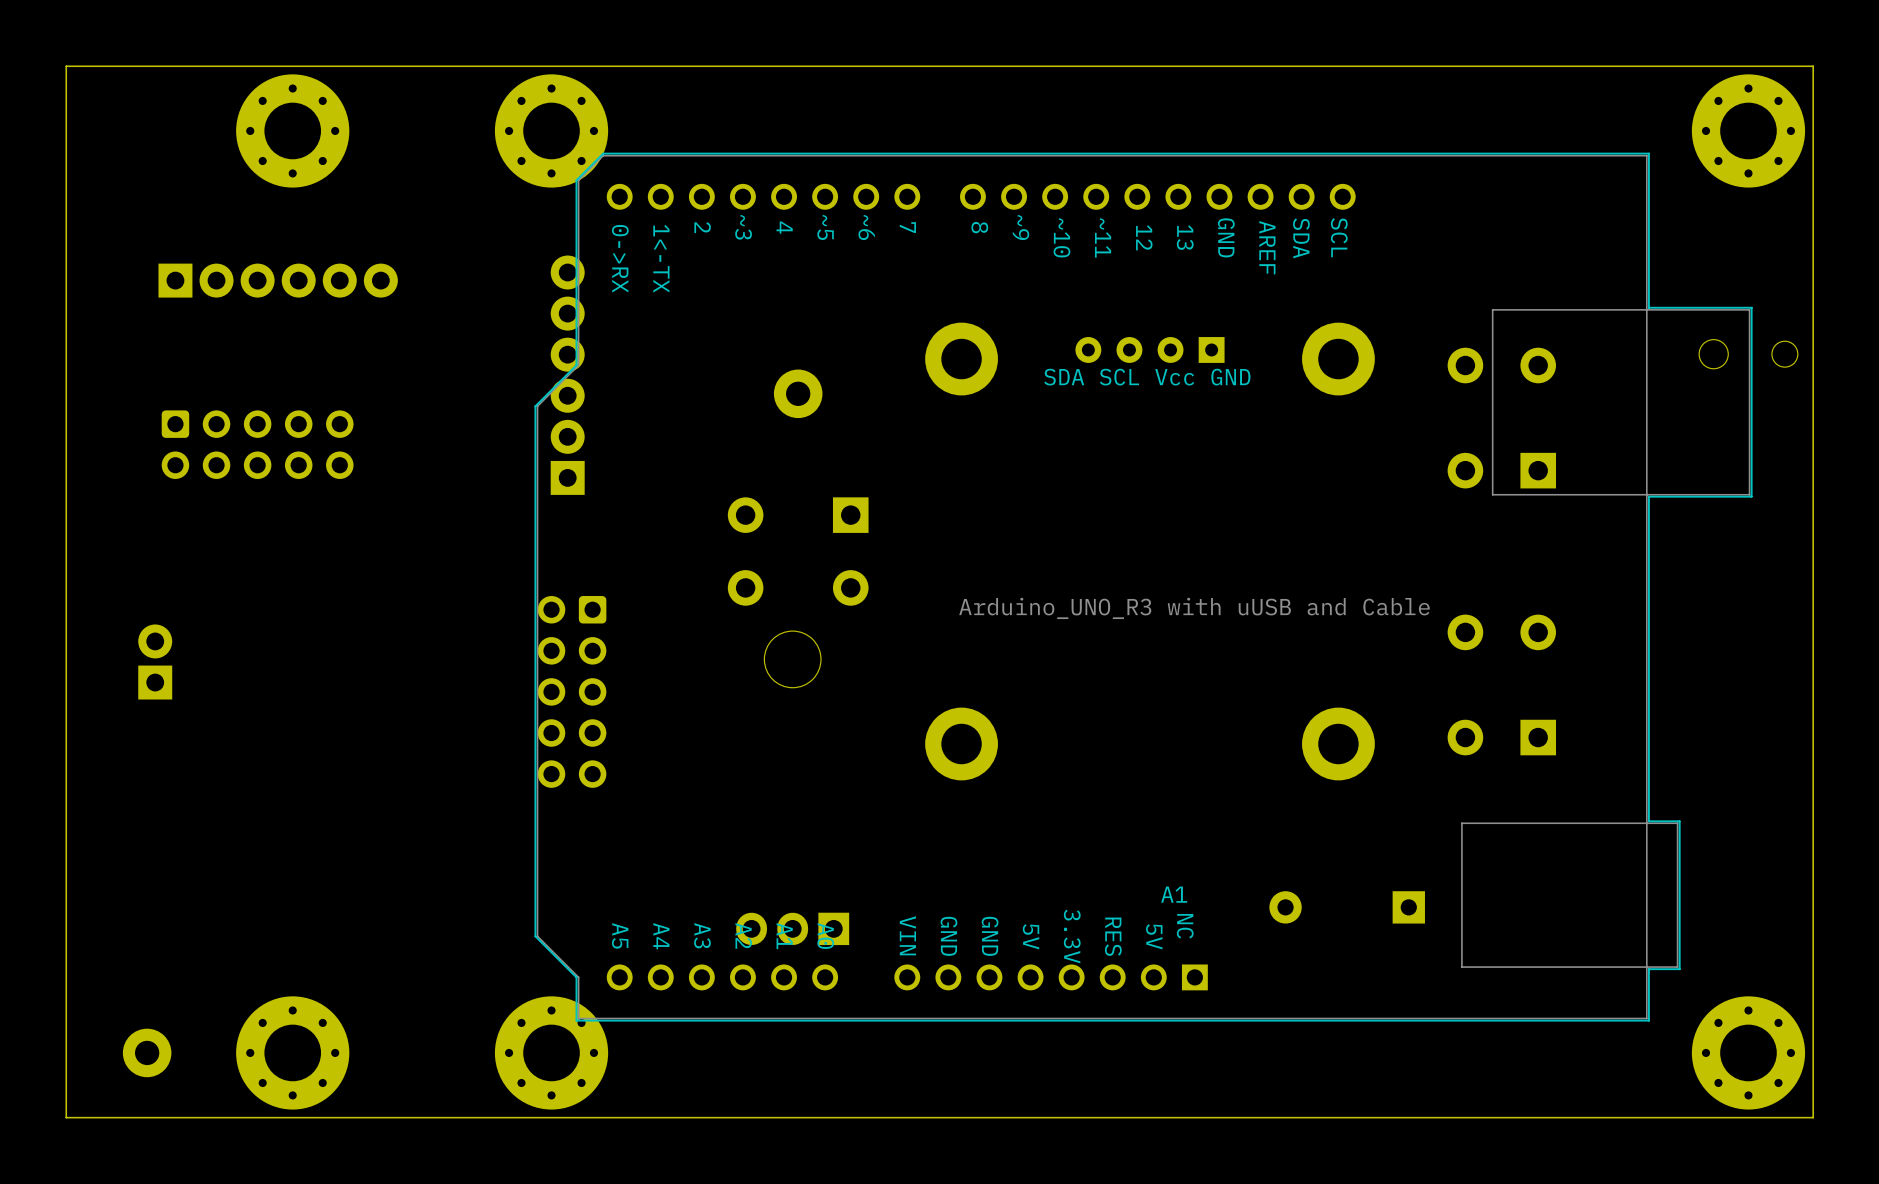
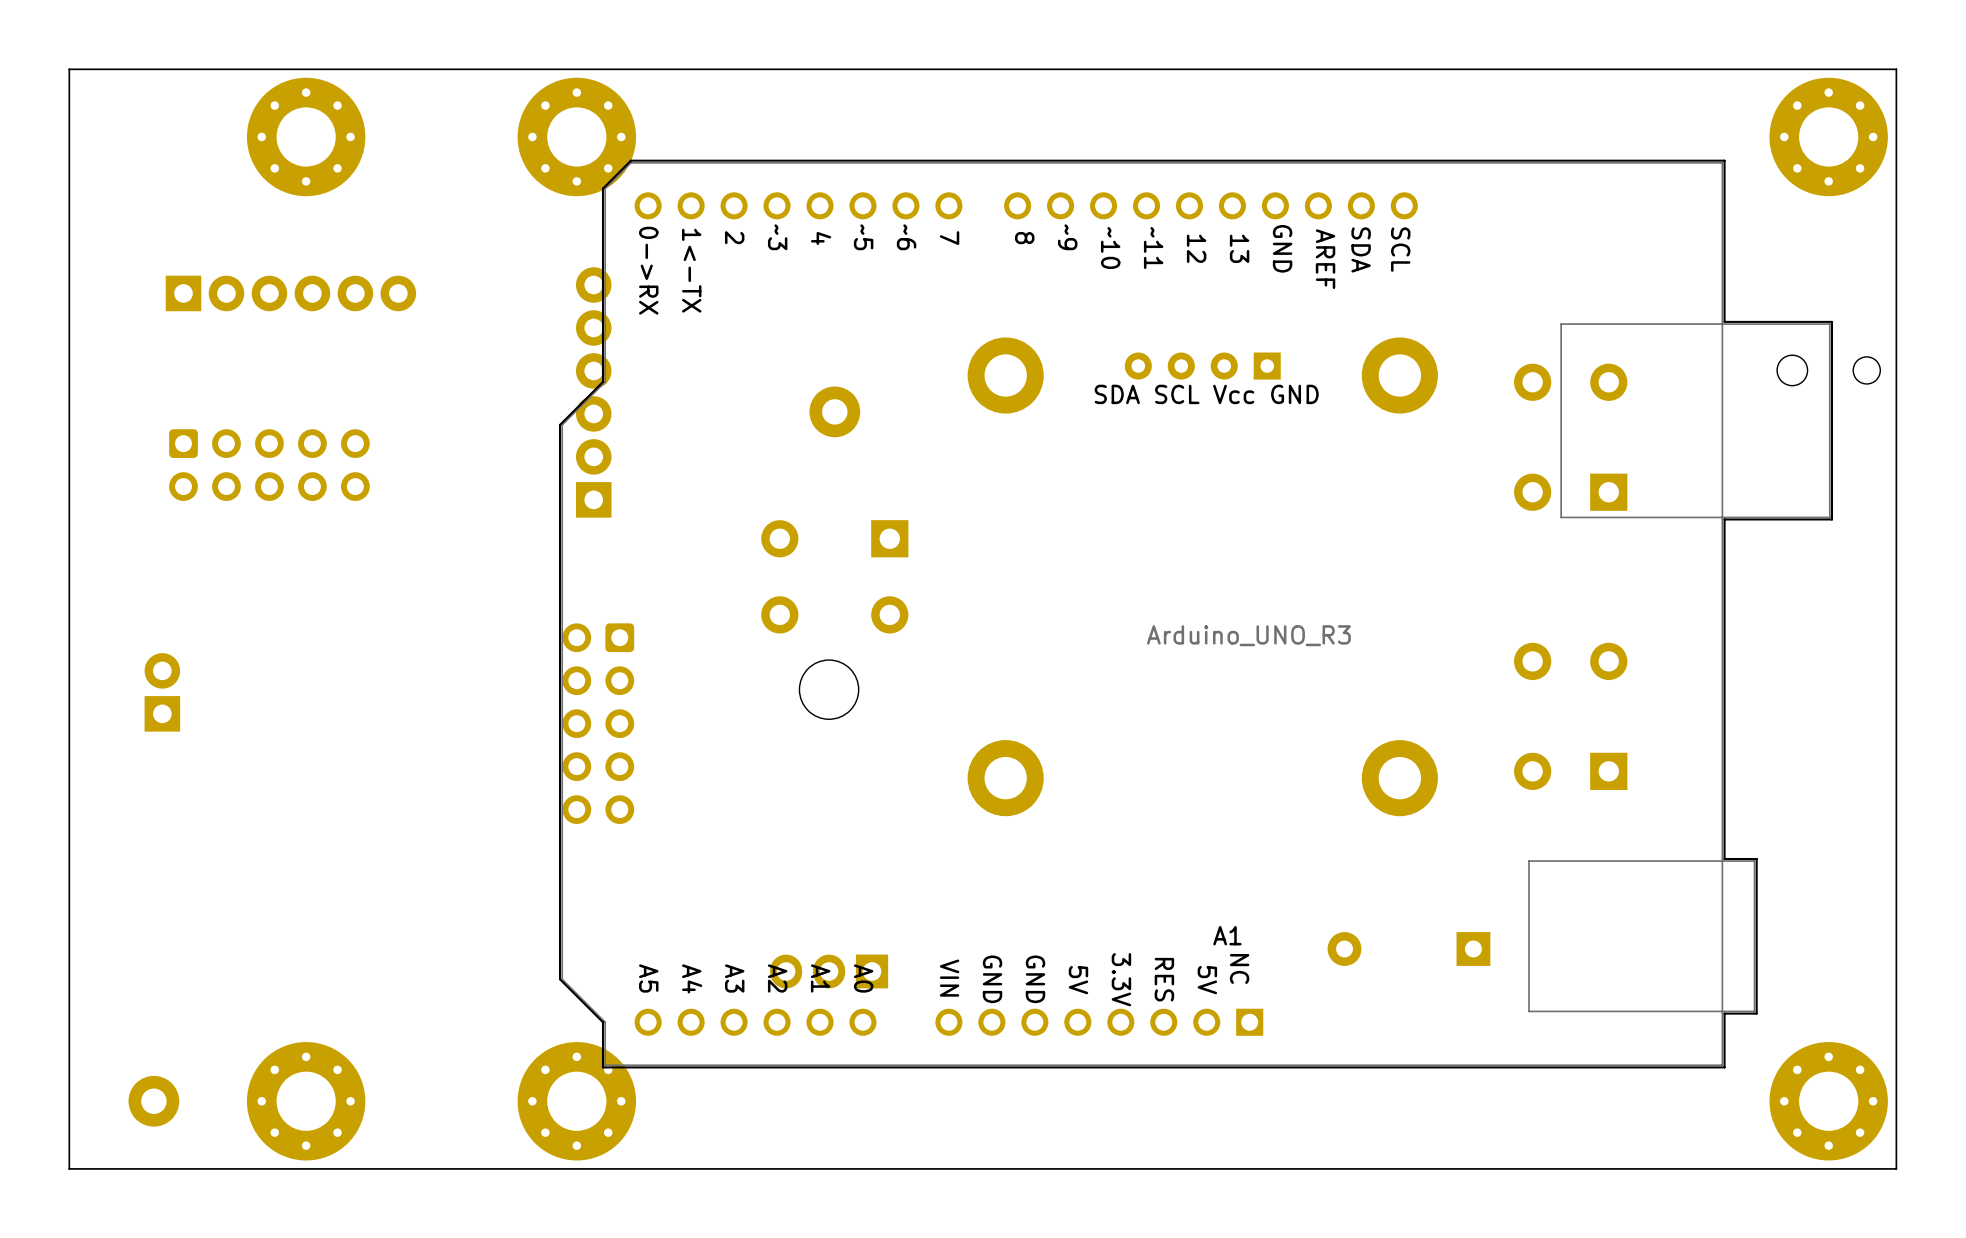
A1 value: Arduino_UNO_R3 with uUSB and Cable (1194, 608) -> Arduino_UNO_R3 (1248, 635)

